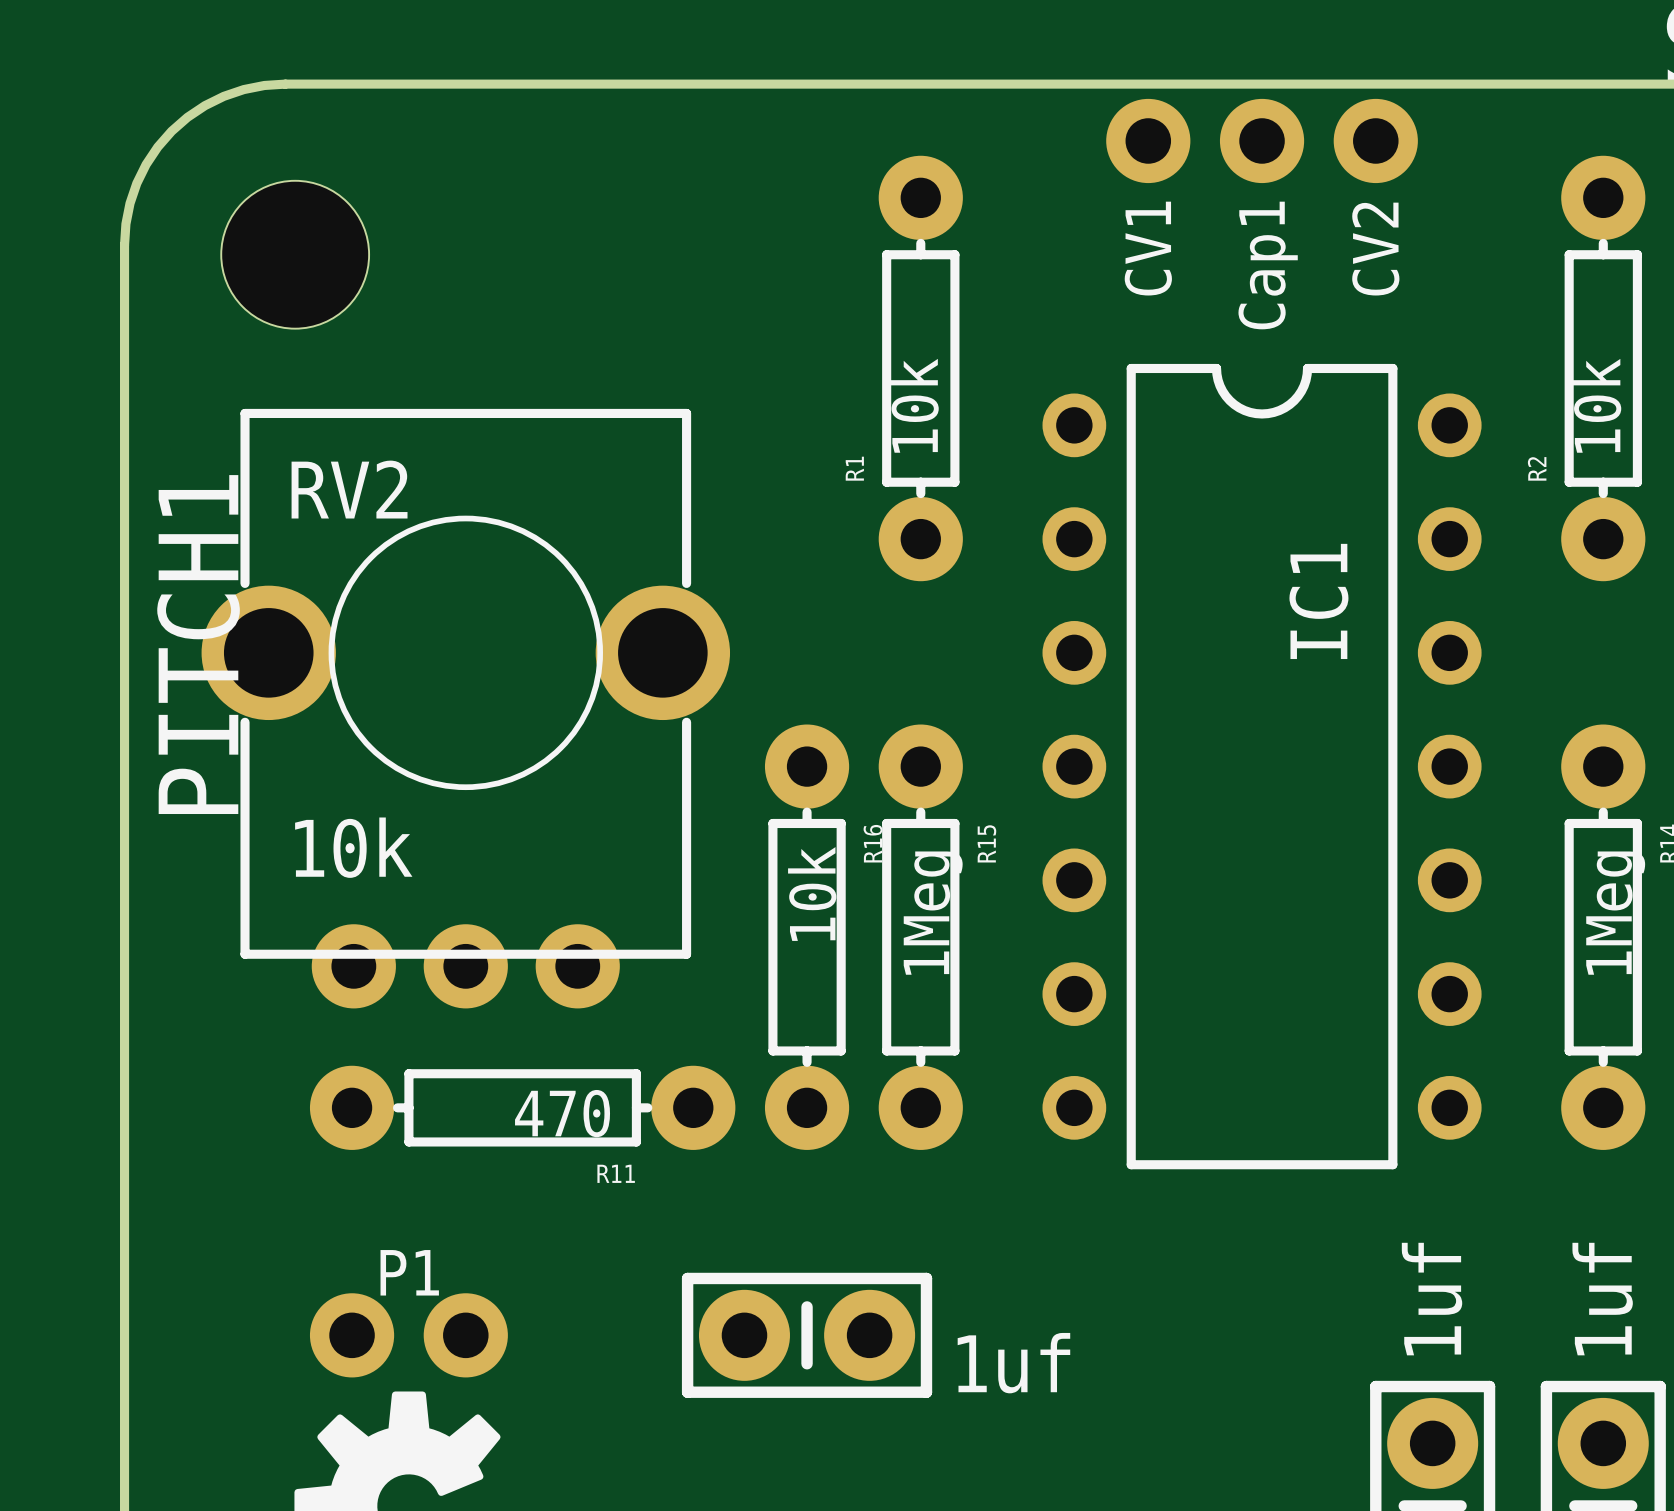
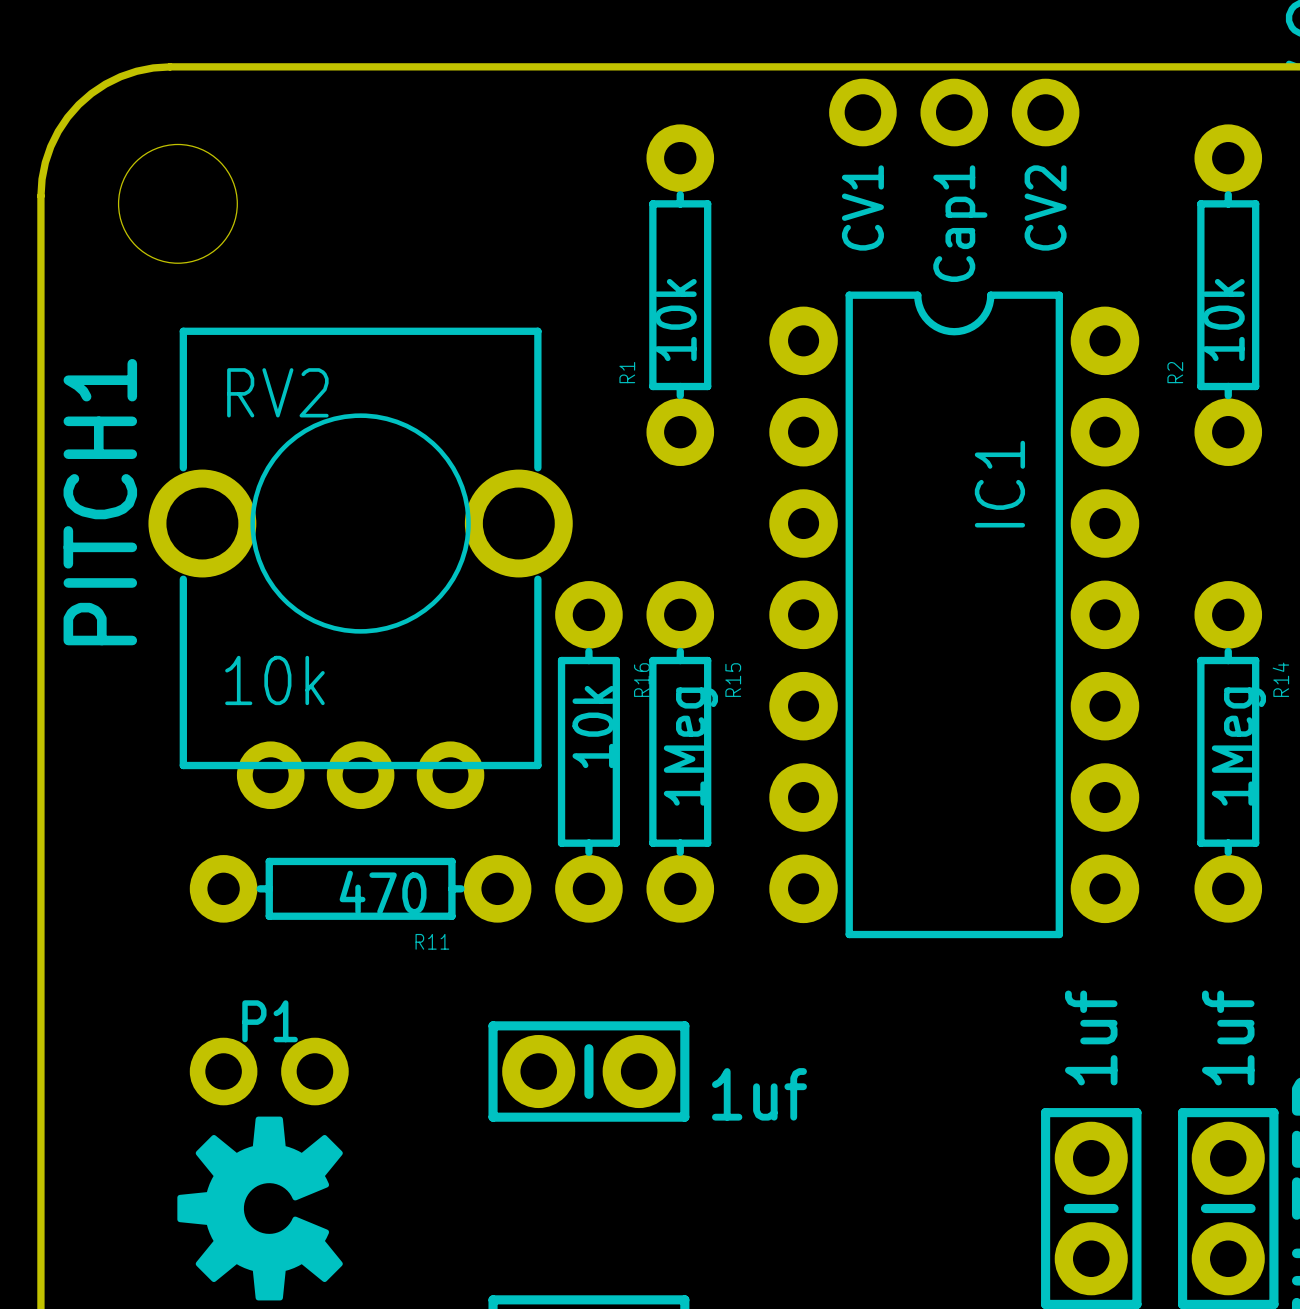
IC1 footprint: [1042, 363, 1482, 1170] -> [769, 291, 1140, 939]
RV2 position: (465, 708) -> (360, 568)

